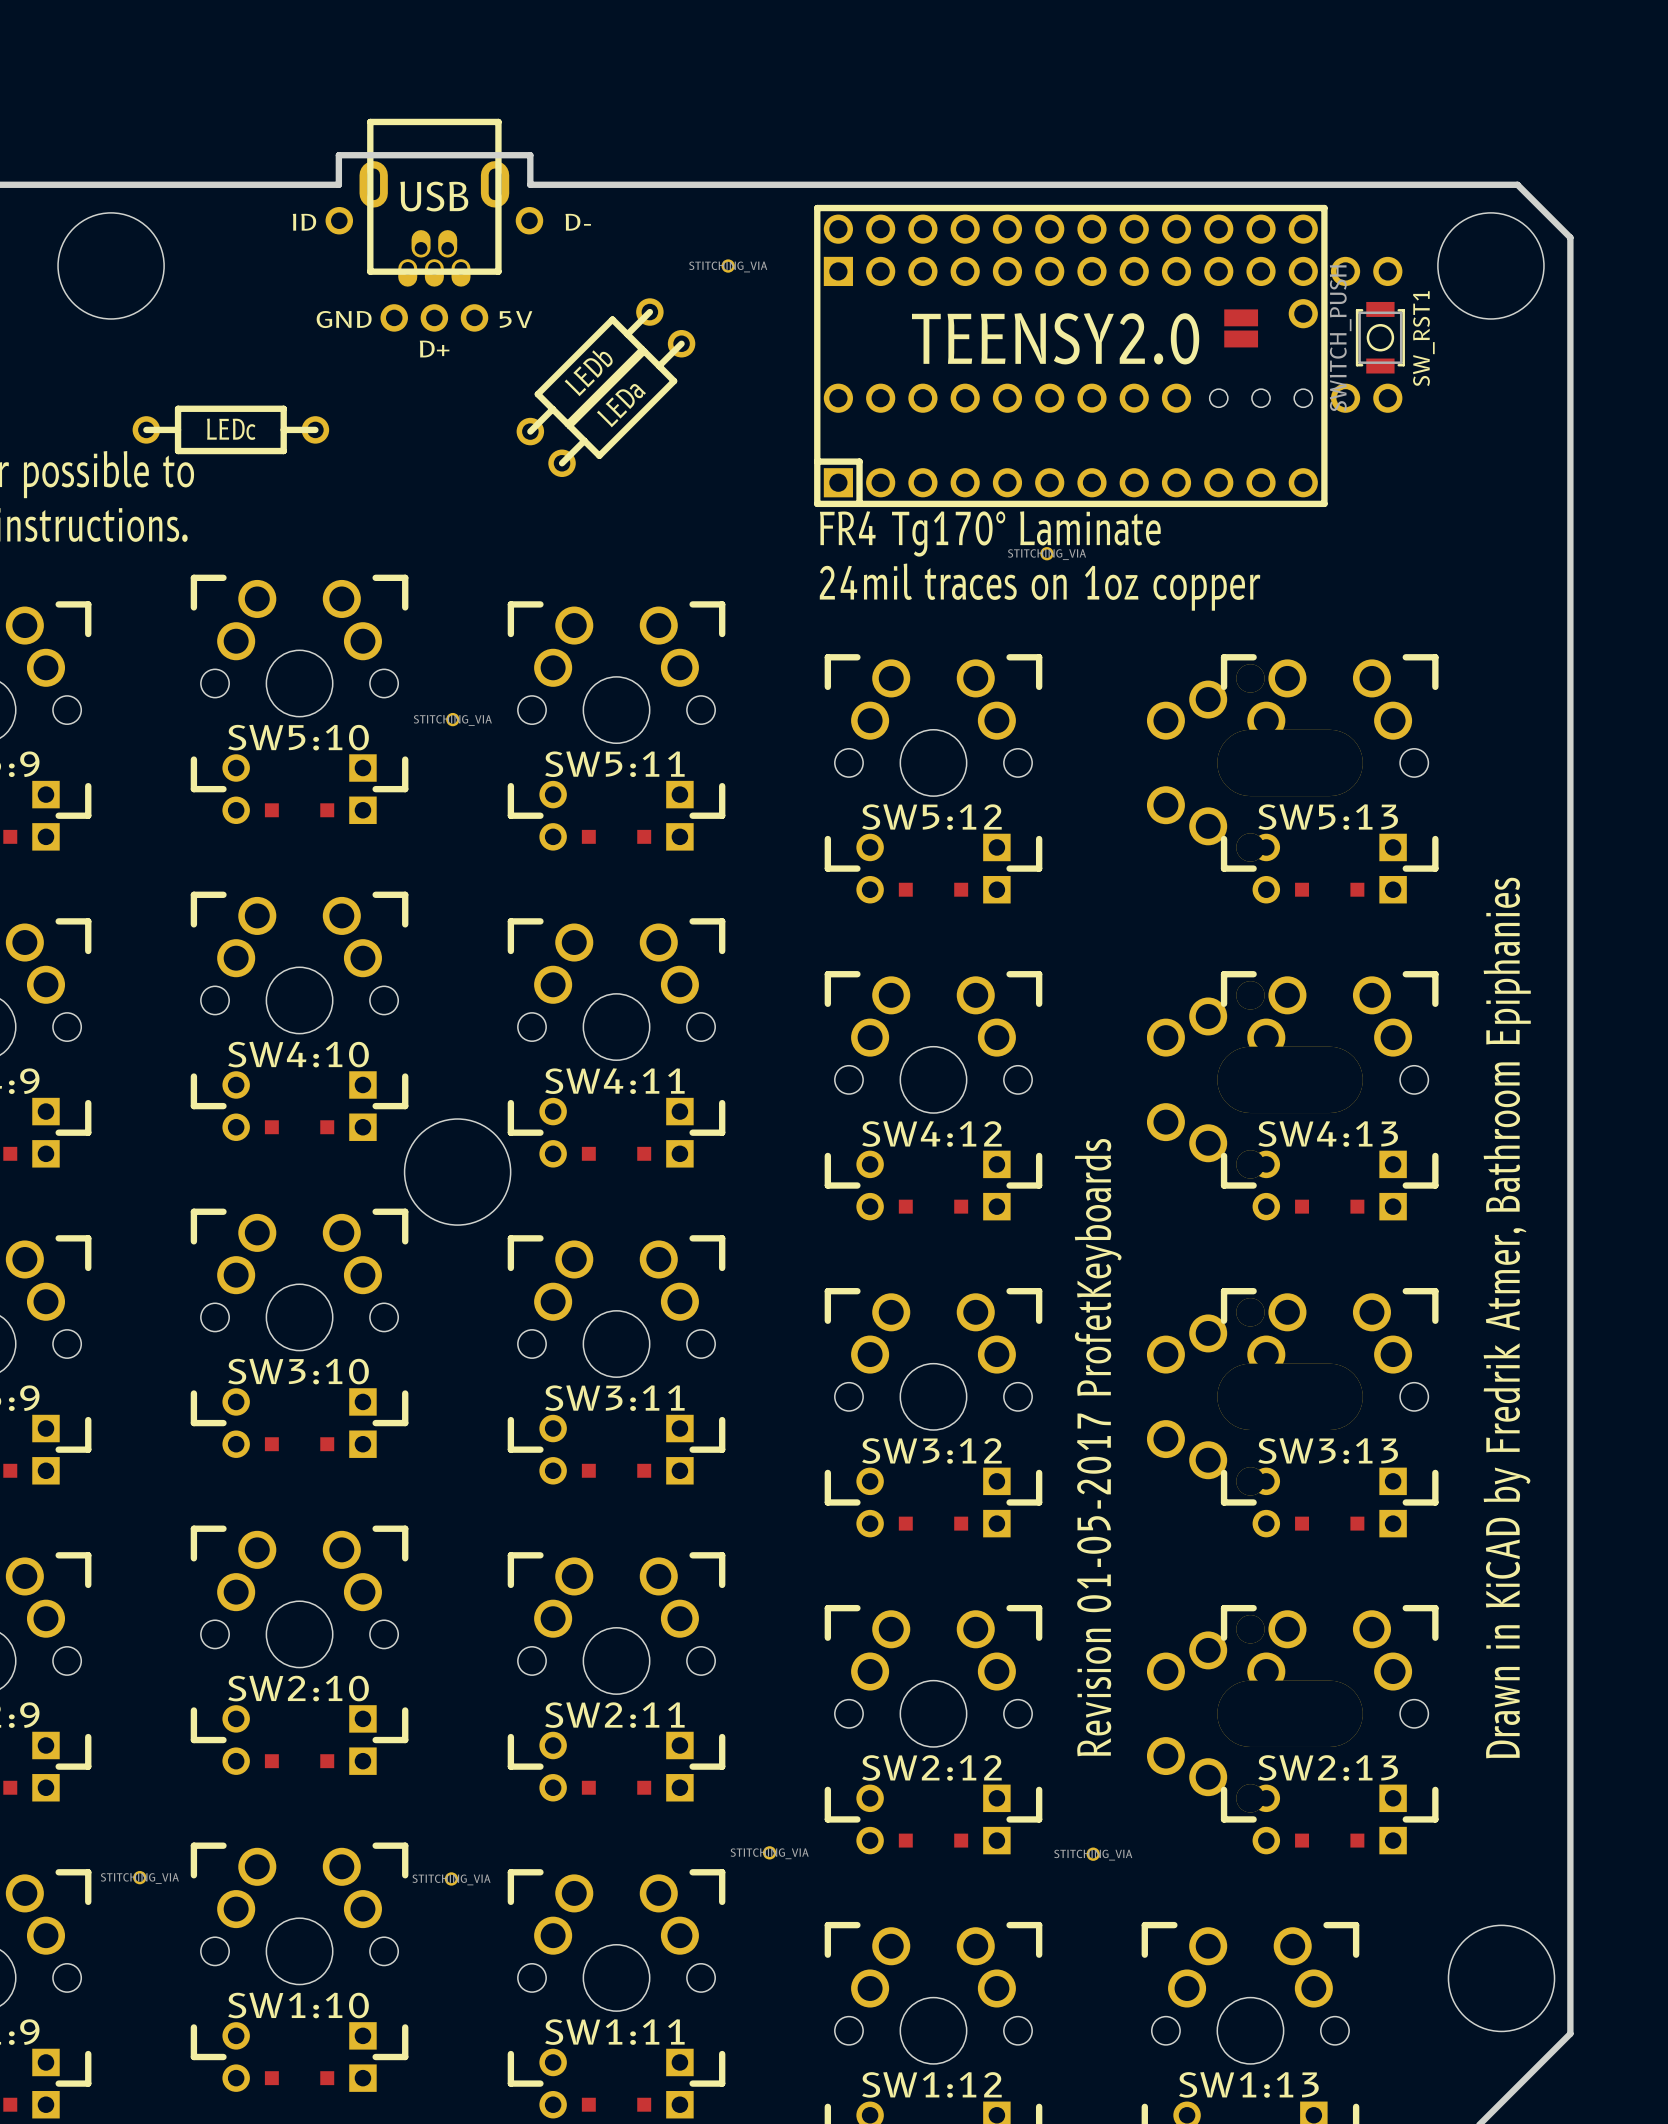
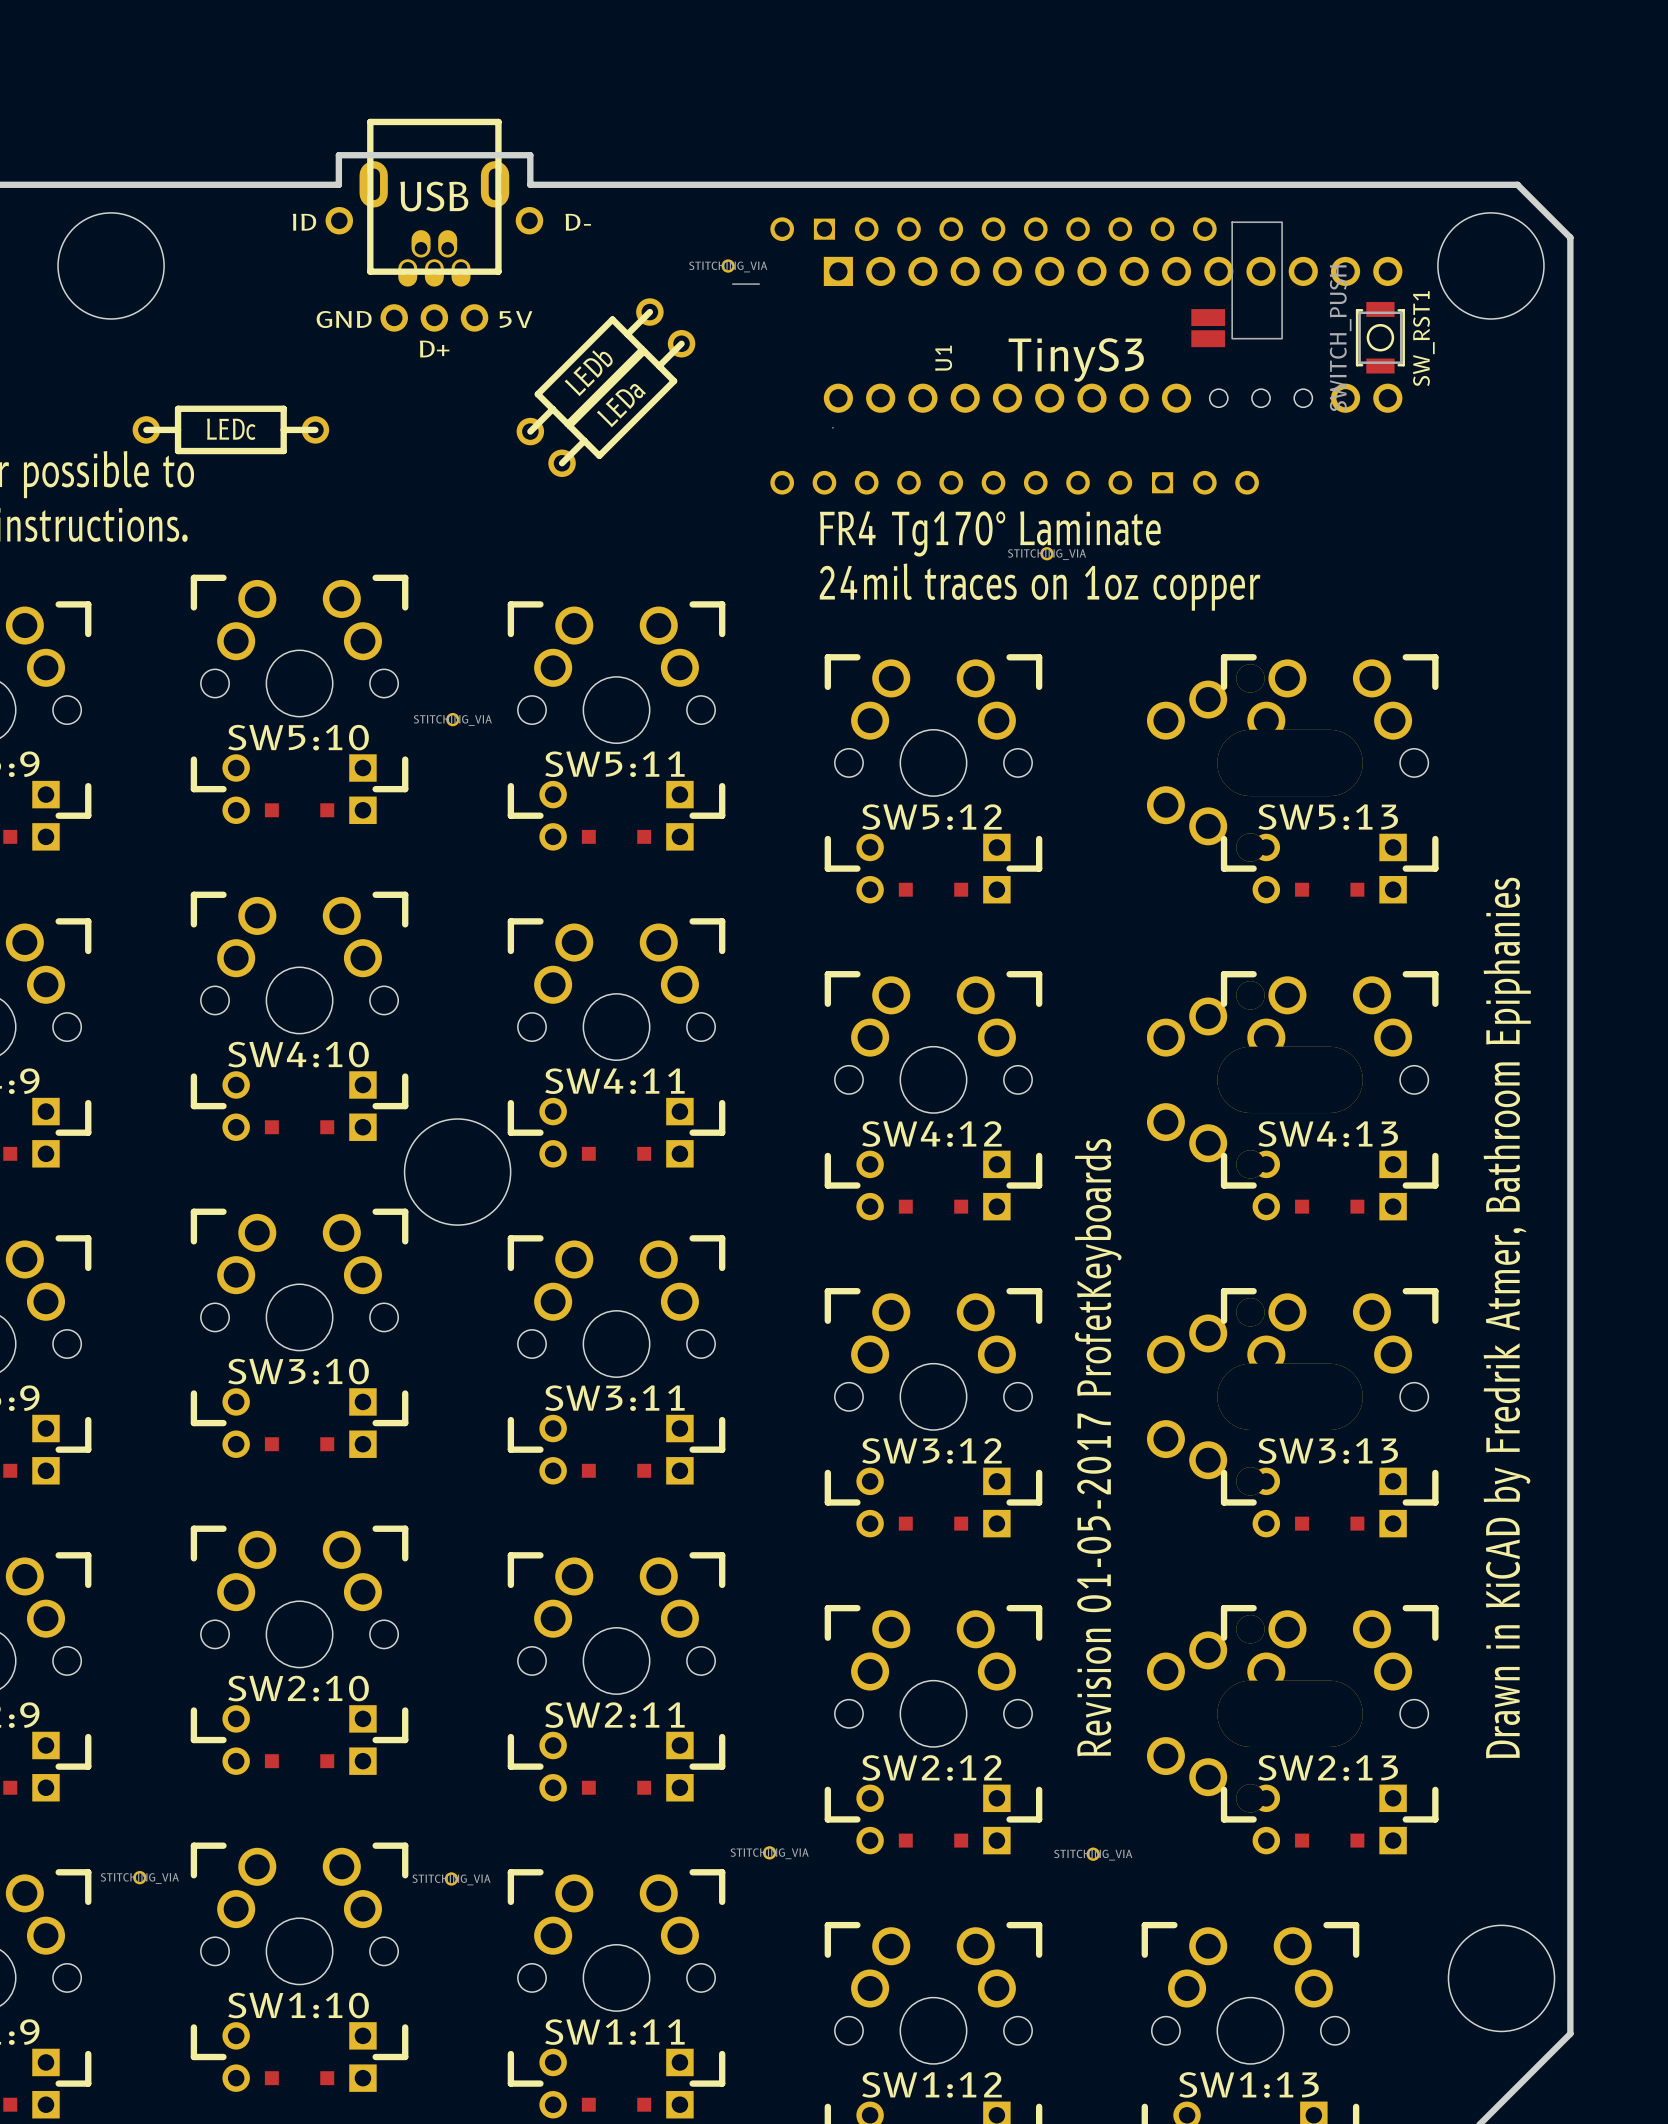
part position: (1241, 328) -> (1208, 328)
U1: none -> TinyS3 (1007, 355)
part: TEENSY2.0 (1070, 355) -> none

